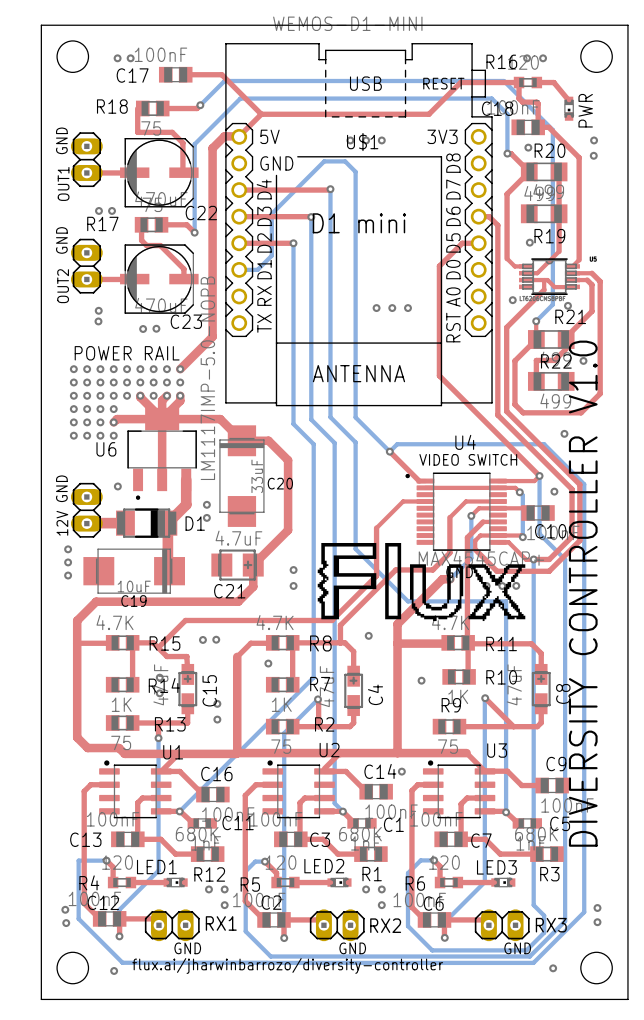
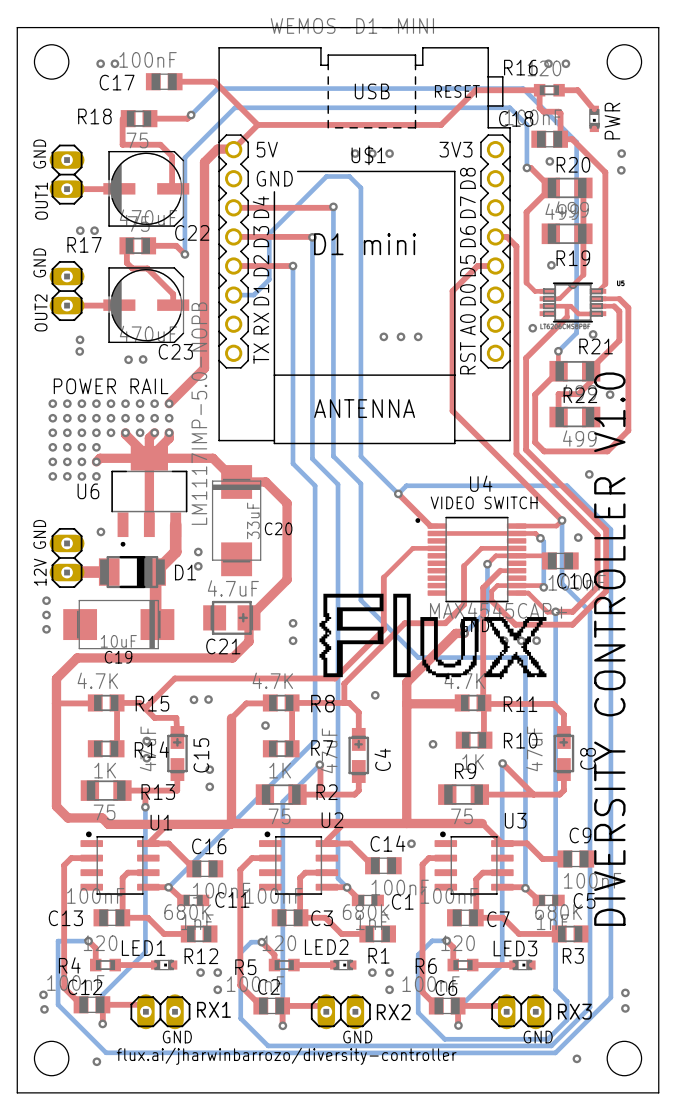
R13 footprint: [105, 715, 140, 731] -> [80, 780, 132, 801]
R2 footprint: [265, 718, 300, 735] -> [255, 784, 307, 805]
R9 footprint: [432, 718, 467, 735] -> [438, 784, 490, 805]

